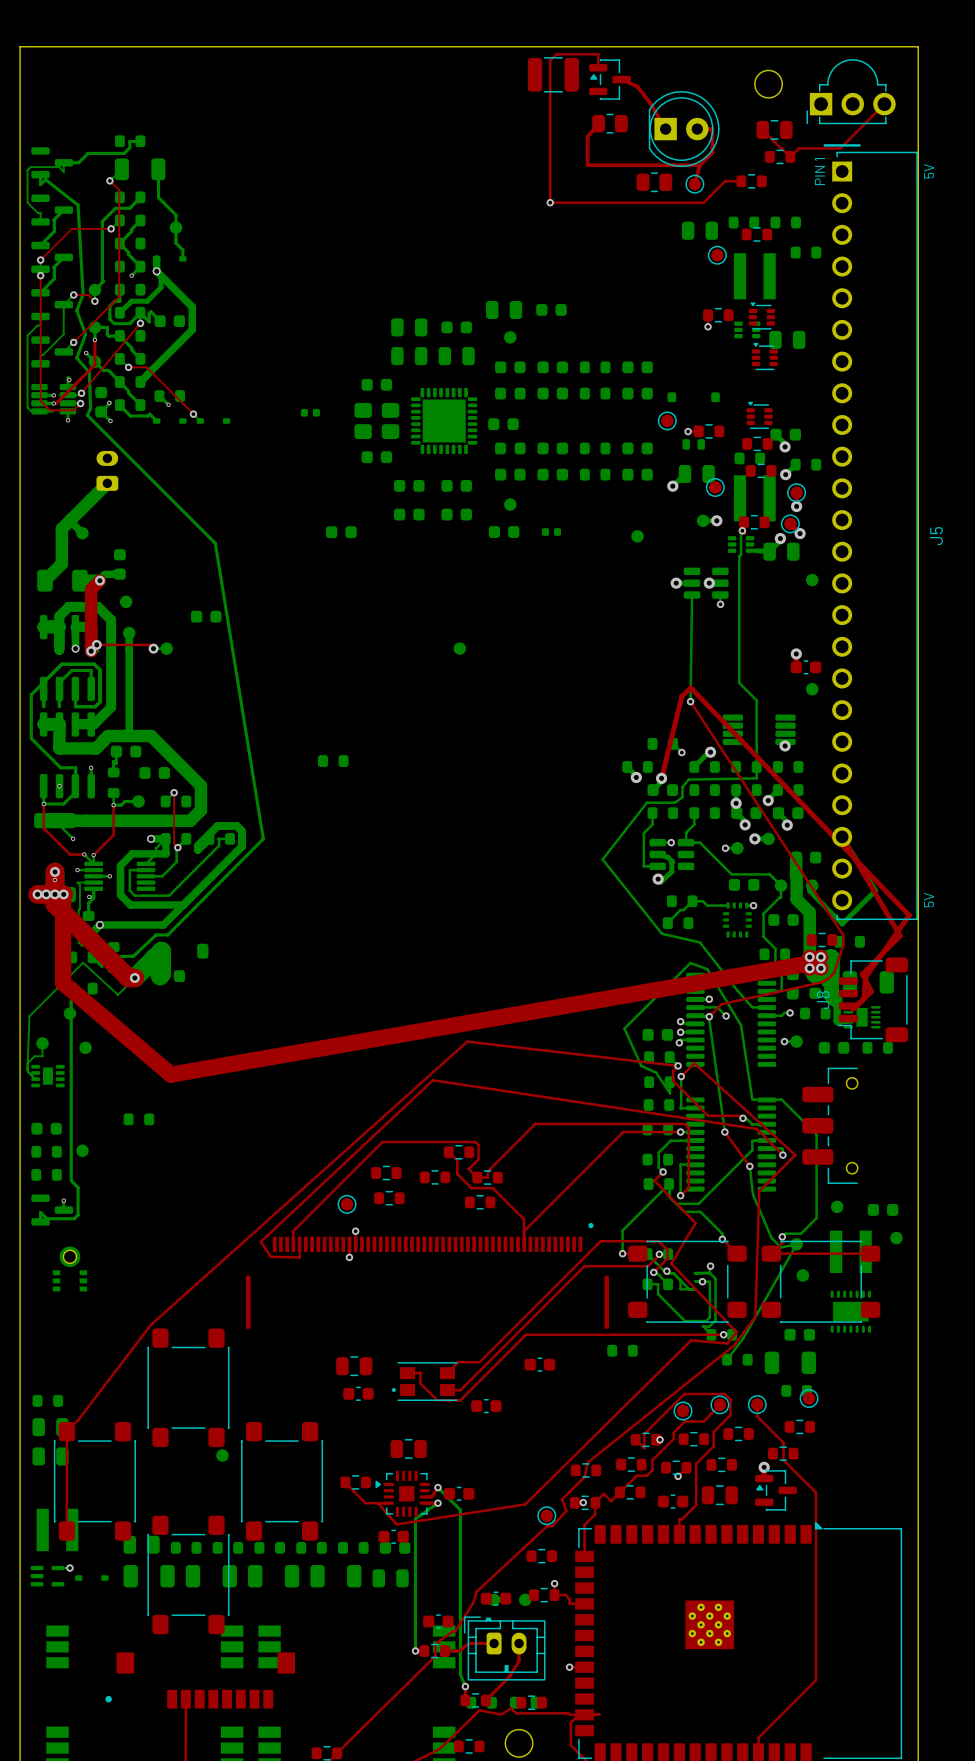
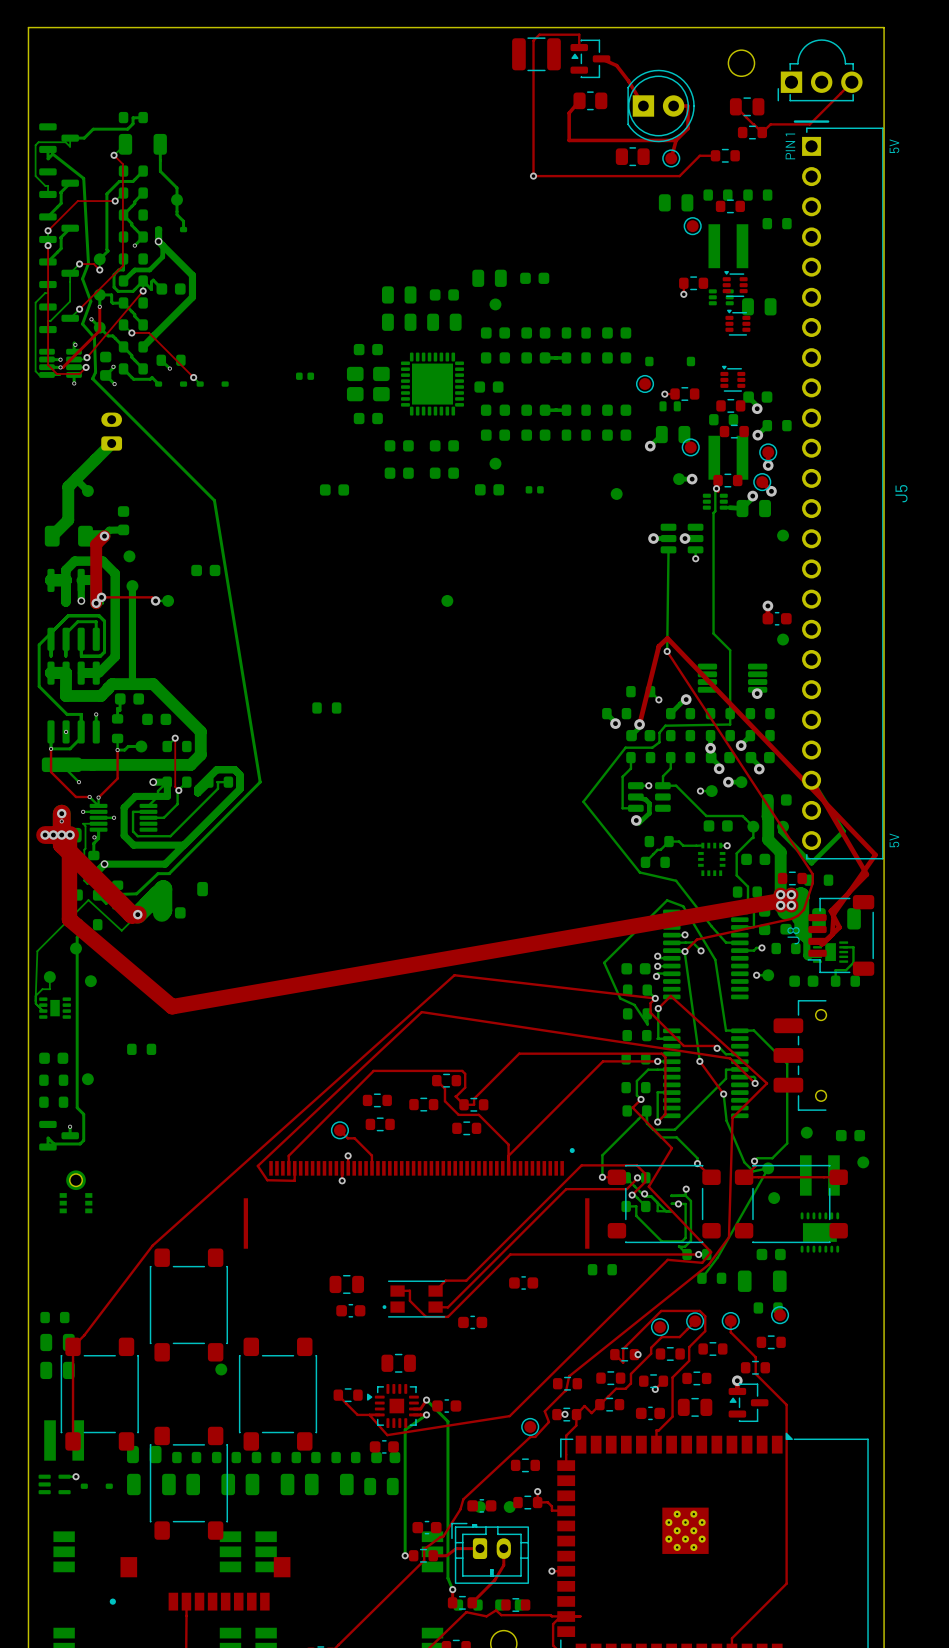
bottom track: none -> (545, 357) (566, 357)
bottom track: none -> (545, 410) (566, 410)
bottom track: none -> (843, 947) (853, 947) (853, 962) (846, 970) (835, 970) (835, 981)
top track: none -> (339, 1130) (347, 1138) (354, 1138) (371, 1155) (372, 1168)

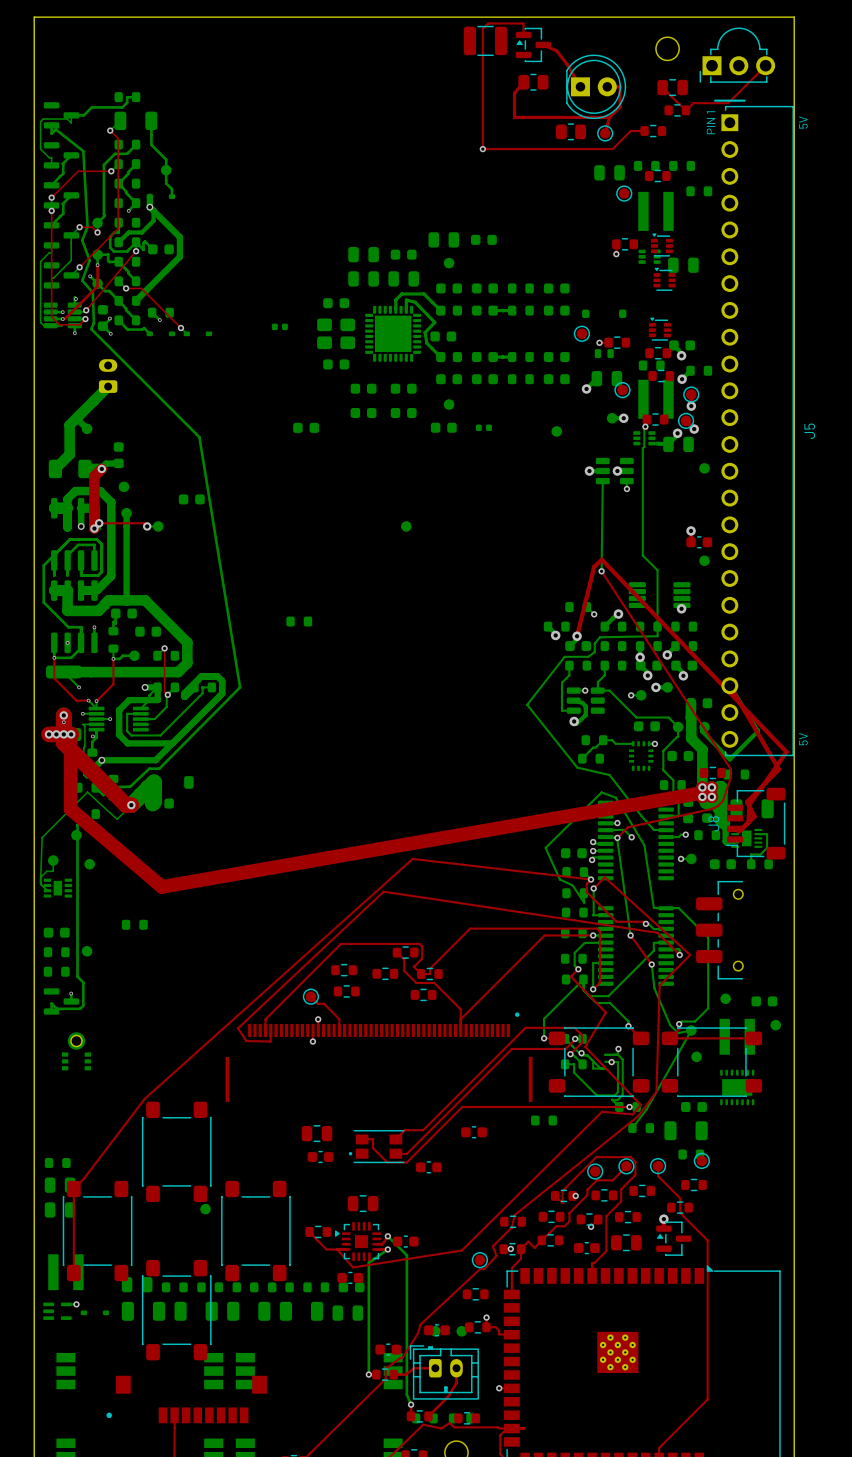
bottom track: none -> (395, 309) (395, 300) (401, 293) (424, 293) (440, 310)
bottom track: none -> (406, 309) (406, 300) (415, 302) (434, 322) (425, 332) (426, 343) (440, 357)

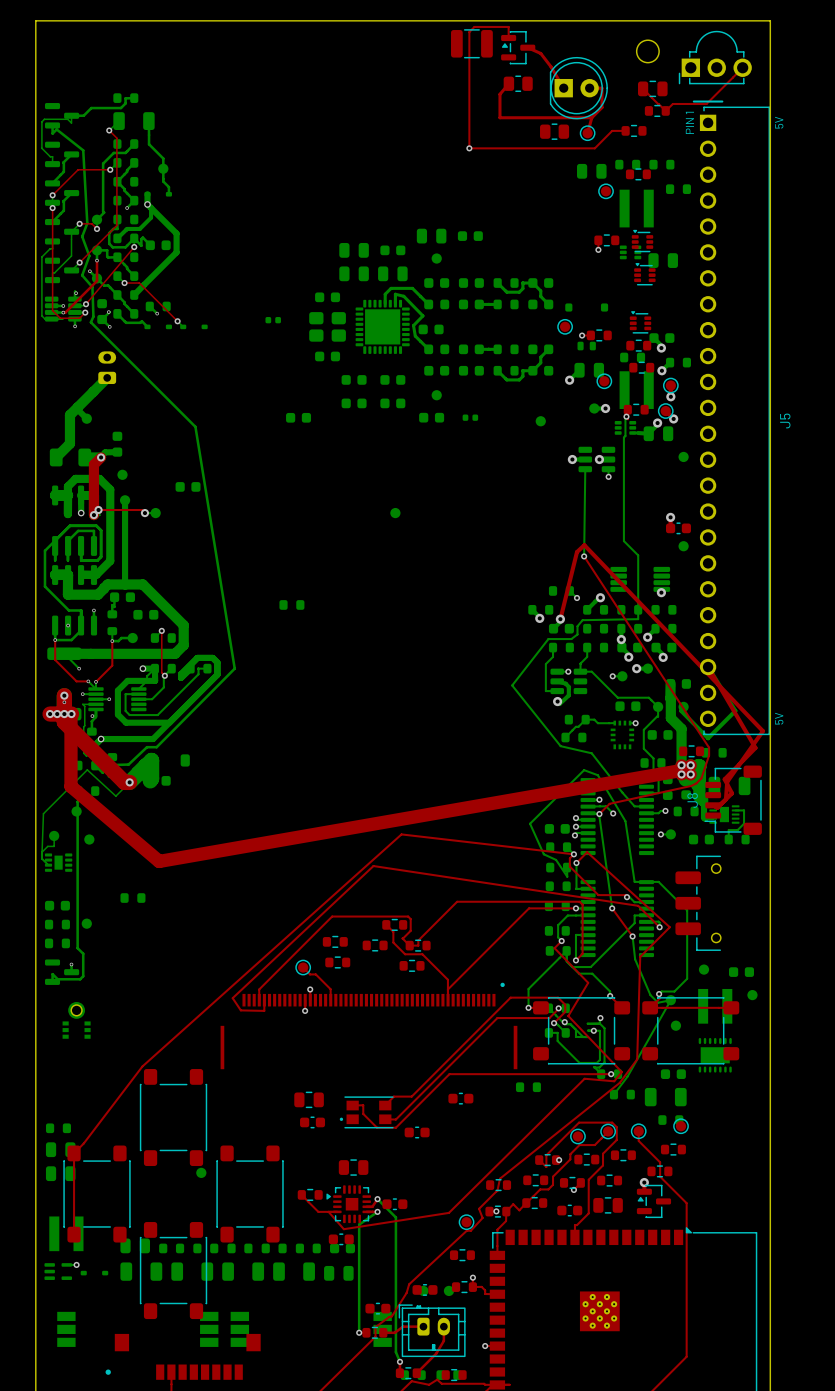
bottom track: none -> (497, 283) (506, 292) (519, 292) (522, 288) (522, 283)
bottom track: none -> (522, 283) (532, 283) (540, 290) (540, 296) (548, 304)
bottom track: none -> (548, 349) (540, 357) (540, 362) (532, 370) (522, 370)
bottom track: none -> (497, 370) (506, 379) (519, 379) (522, 376) (522, 370)

